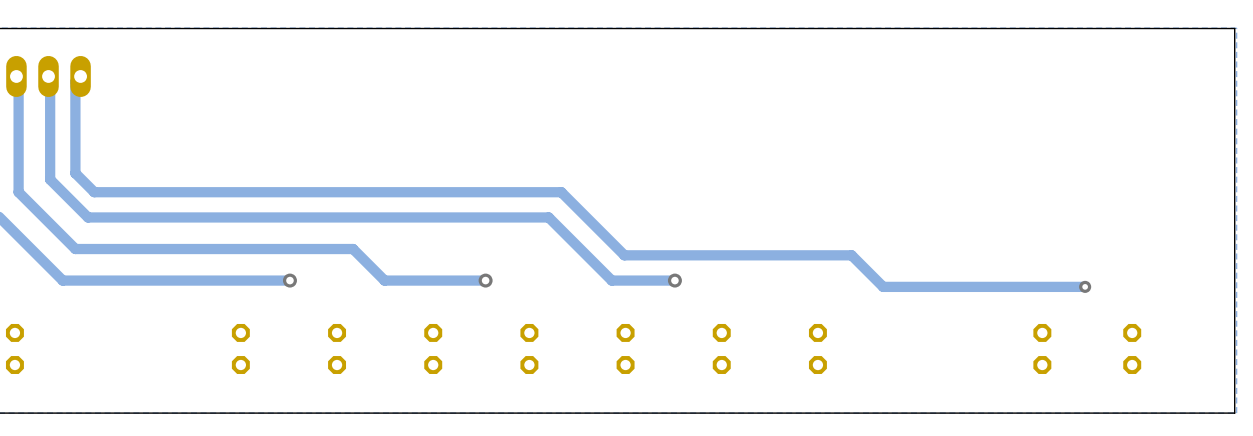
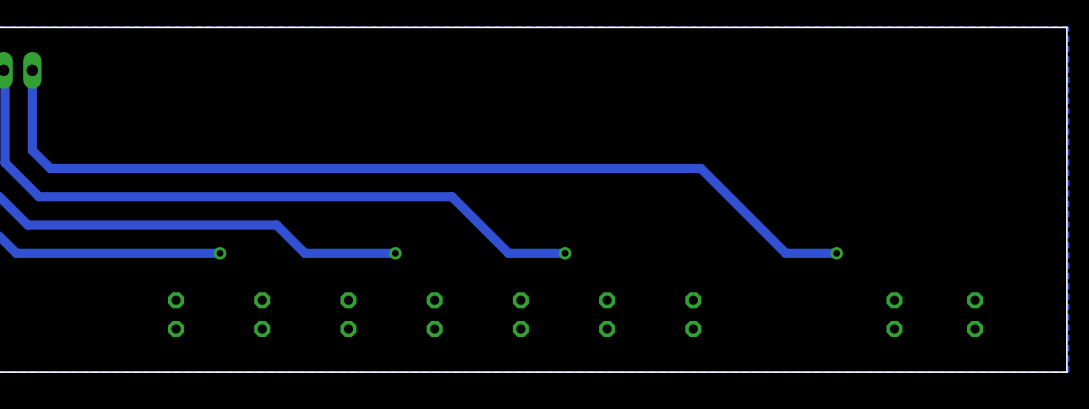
track: (80, 76) (75, 81) (75, 173) (94, 192) (561, 192) (624, 255) (851, 255) (883, 286) (1085, 286) -> (32, 70) (32, 150) (50, 168) (700, 168) (785, 253) (836, 253)
via: none -> (836, 253)
via: (1085, 286) -> none

